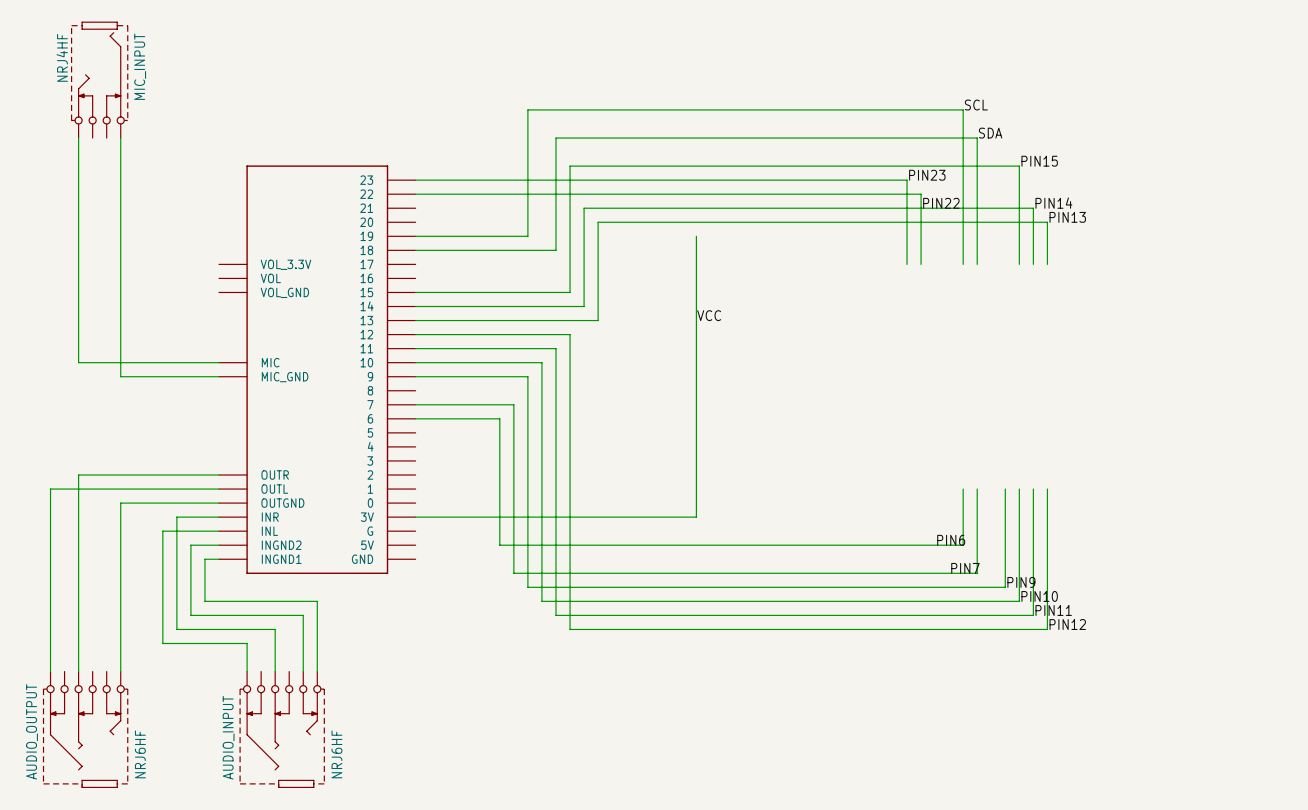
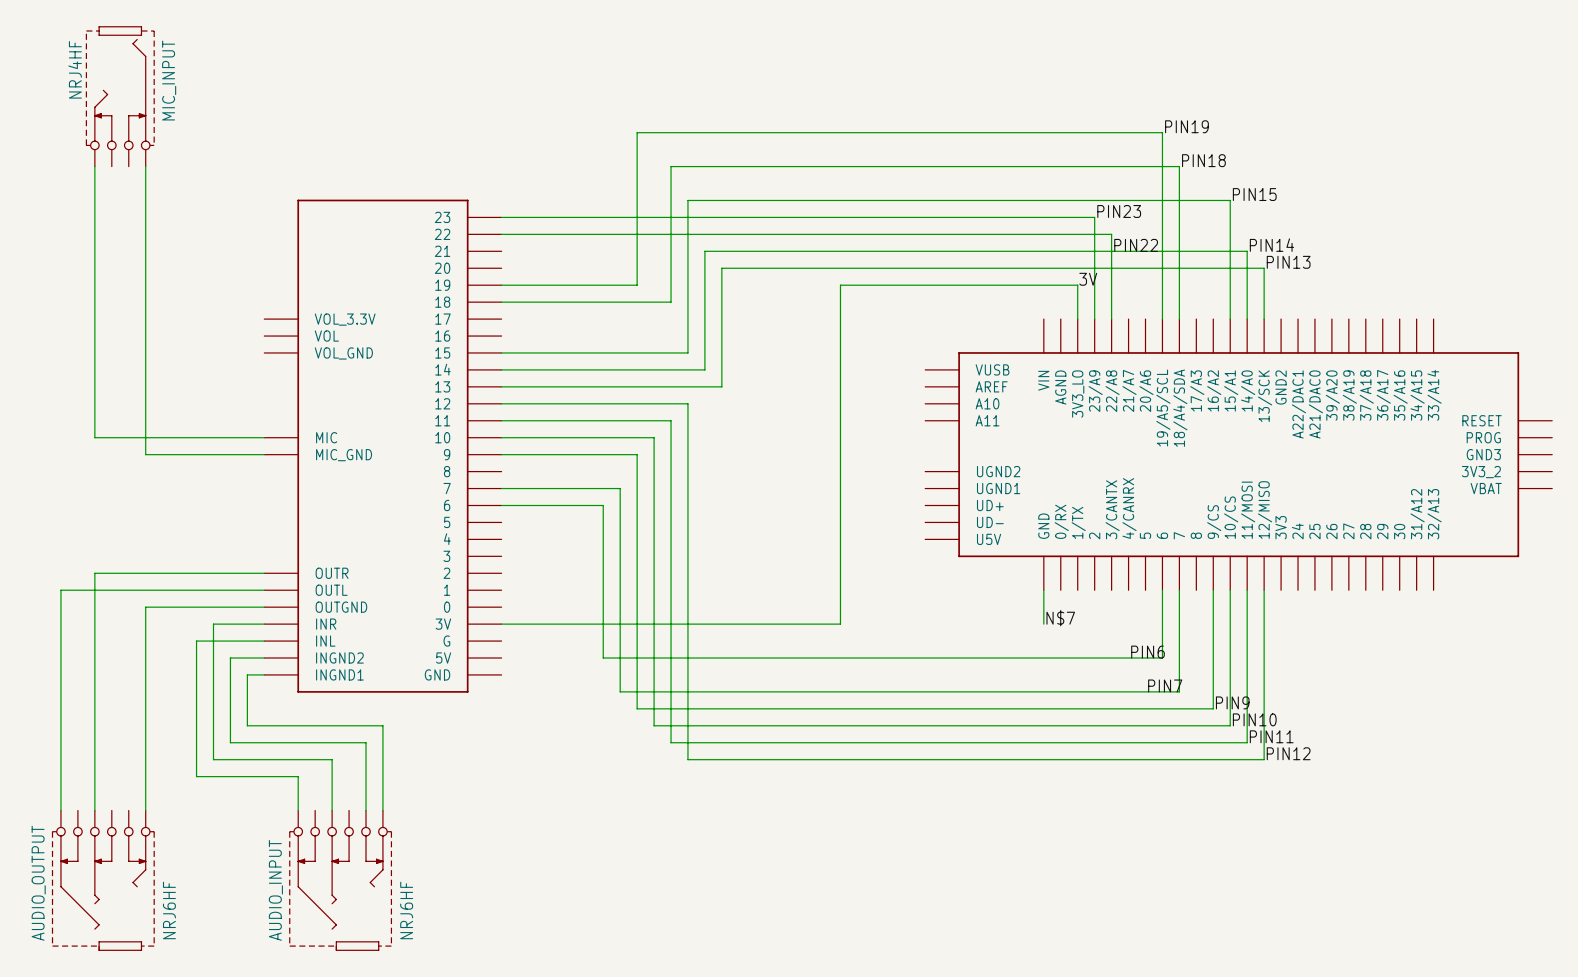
label: SCL (976, 105) -> PIN19 (1186, 126)
label: SDA (990, 133) -> PIN18 (1203, 160)
label: none -> 3V (1088, 279)
wire: none -> (840, 285) (1077, 285) (1077, 319)
label: VCC (709, 315) -> none
part: none -> (1238, 454)
wire: none -> (1043, 590) (1043, 624)
label: none -> N$7 (1060, 618)

